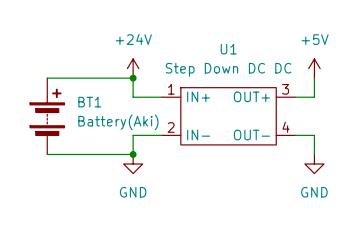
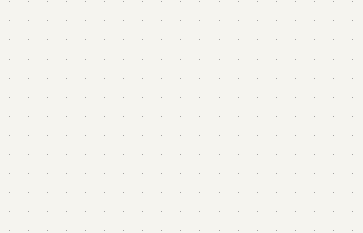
power symbol: +24V (133, 68) -> none
power symbol: +5V (314, 68) -> none
wire: (47, 78) (133, 78) (133, 97) (161, 97) -> none
junction: (133, 78) -> none
wire: (314, 78) (314, 97) (295, 97) -> none
BT1: Battery(Aki) (47, 116) -> none
U1: Step Down DC DC (228, 116) -> none
wire: (161, 135) (133, 135) (133, 154) (47, 154) -> none
wire: (295, 135) (314, 135) (314, 154) -> none
junction: (133, 154) -> none
power symbol: GND (133, 164) -> none
power symbol: GND (314, 164) -> none

